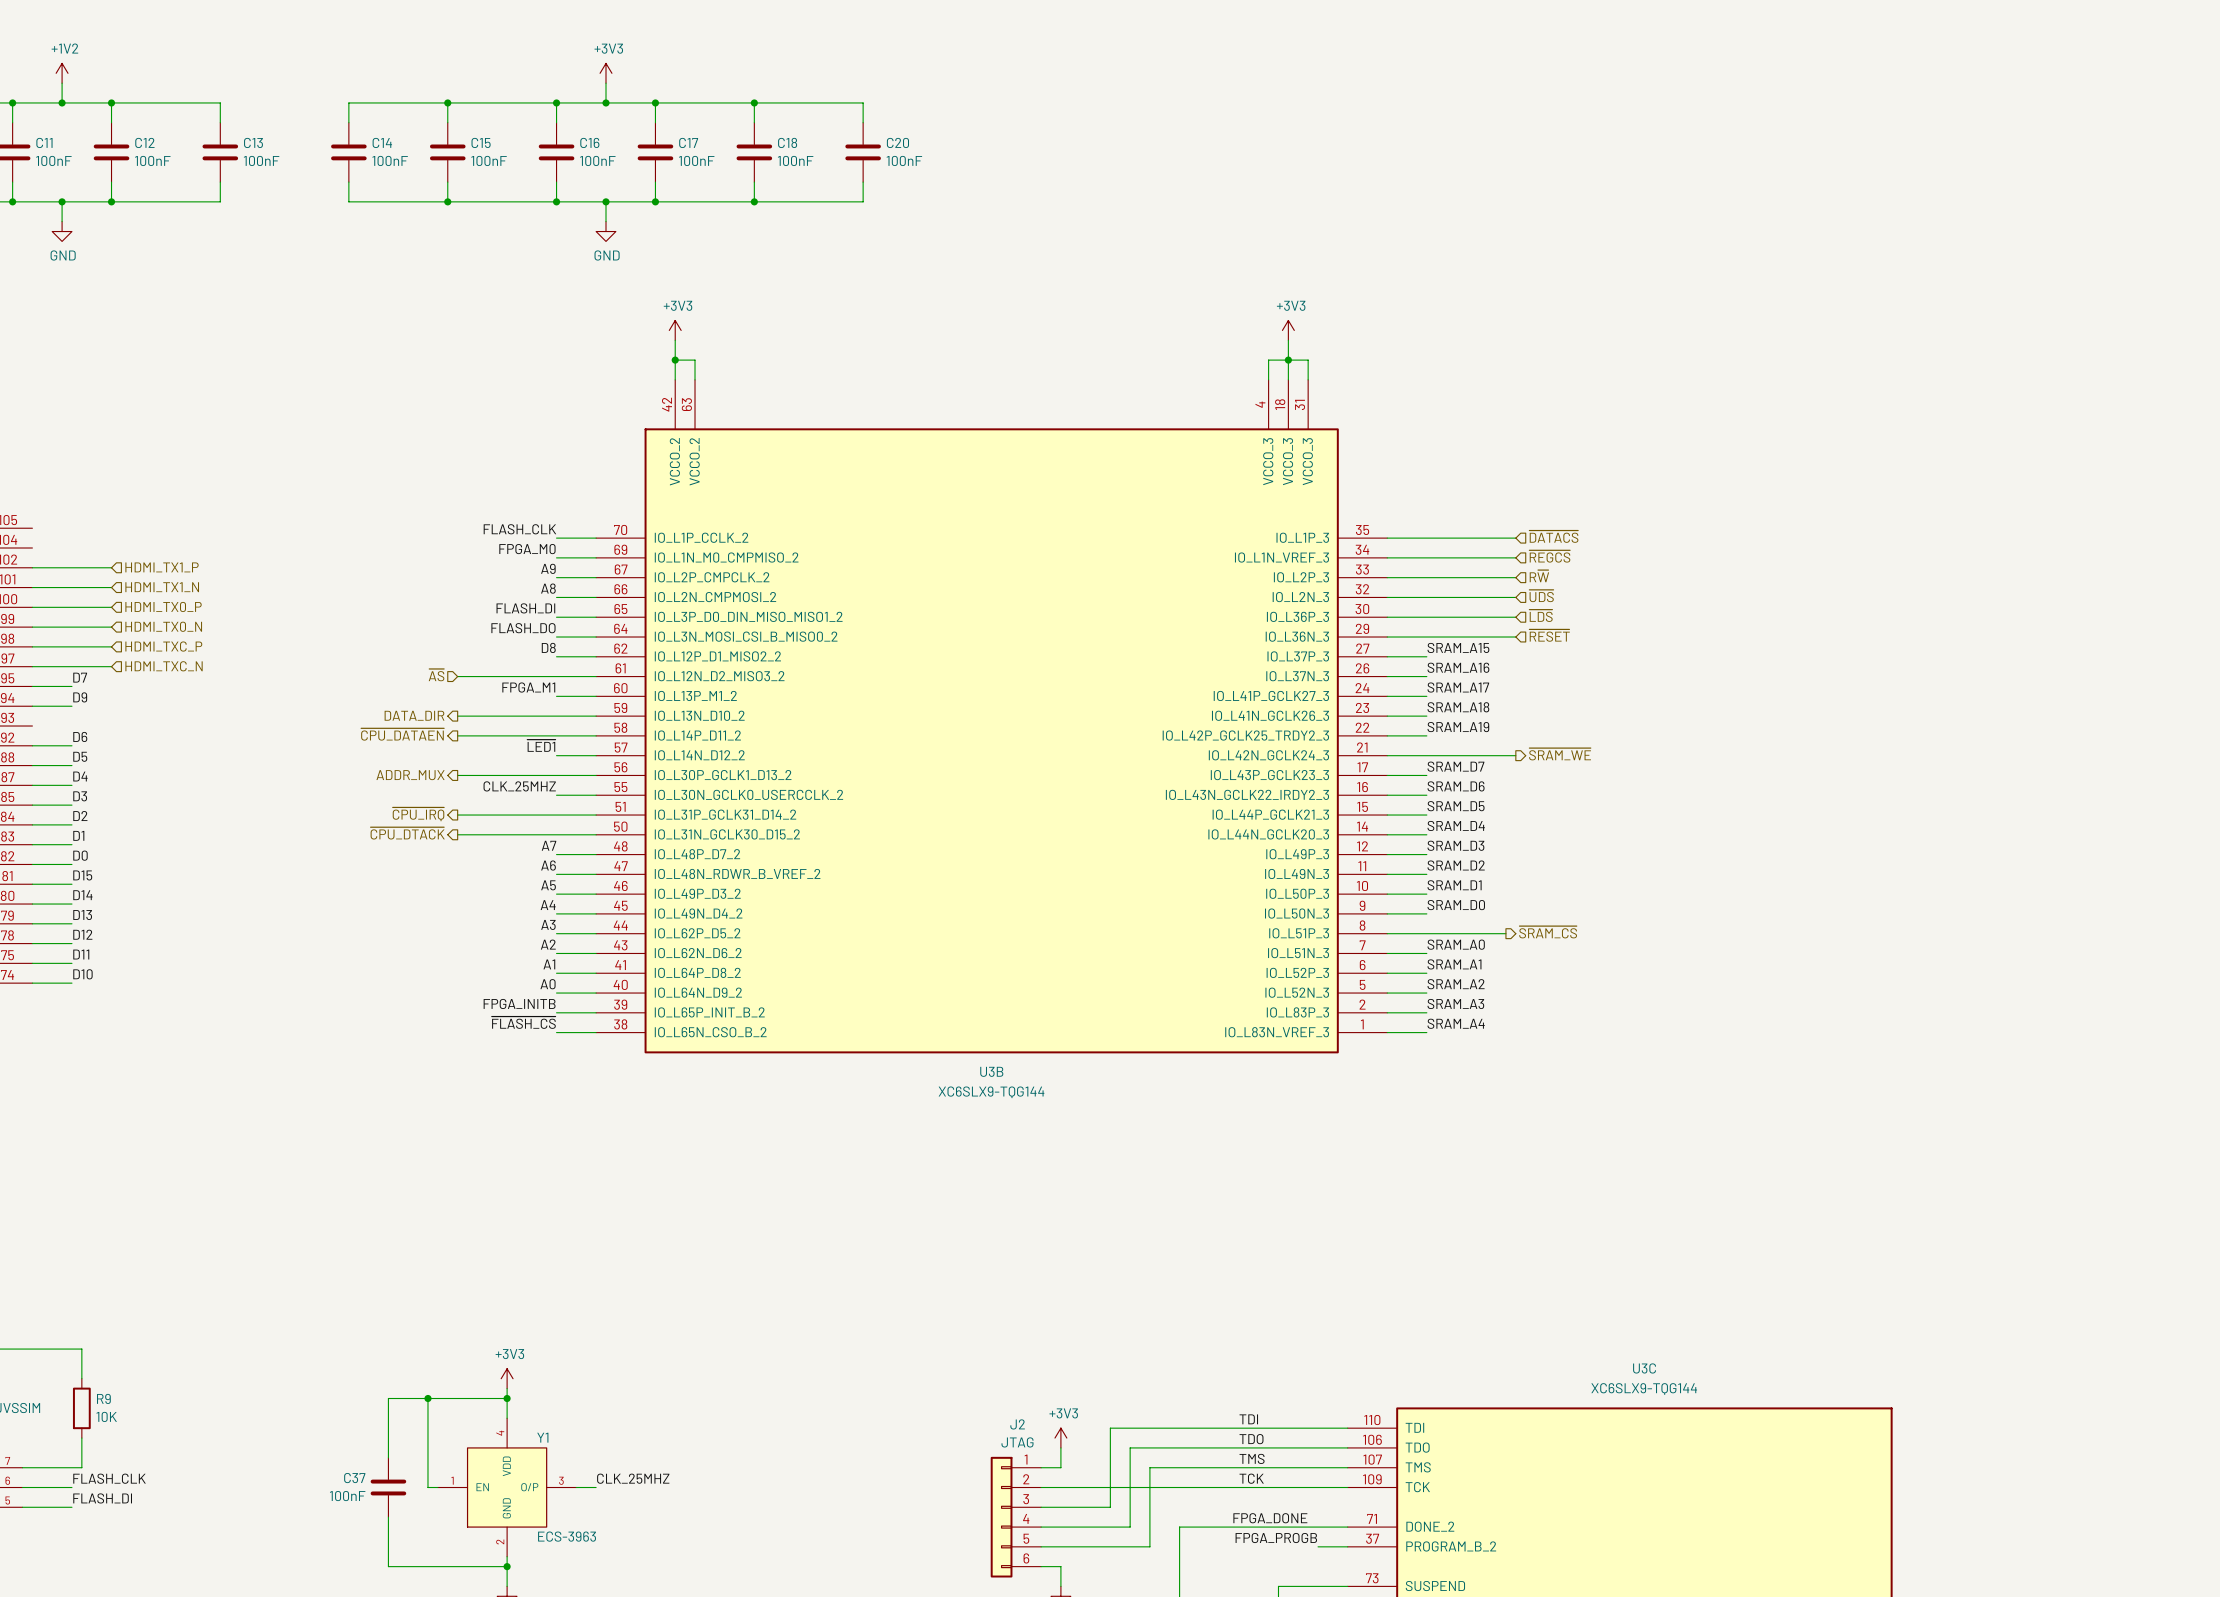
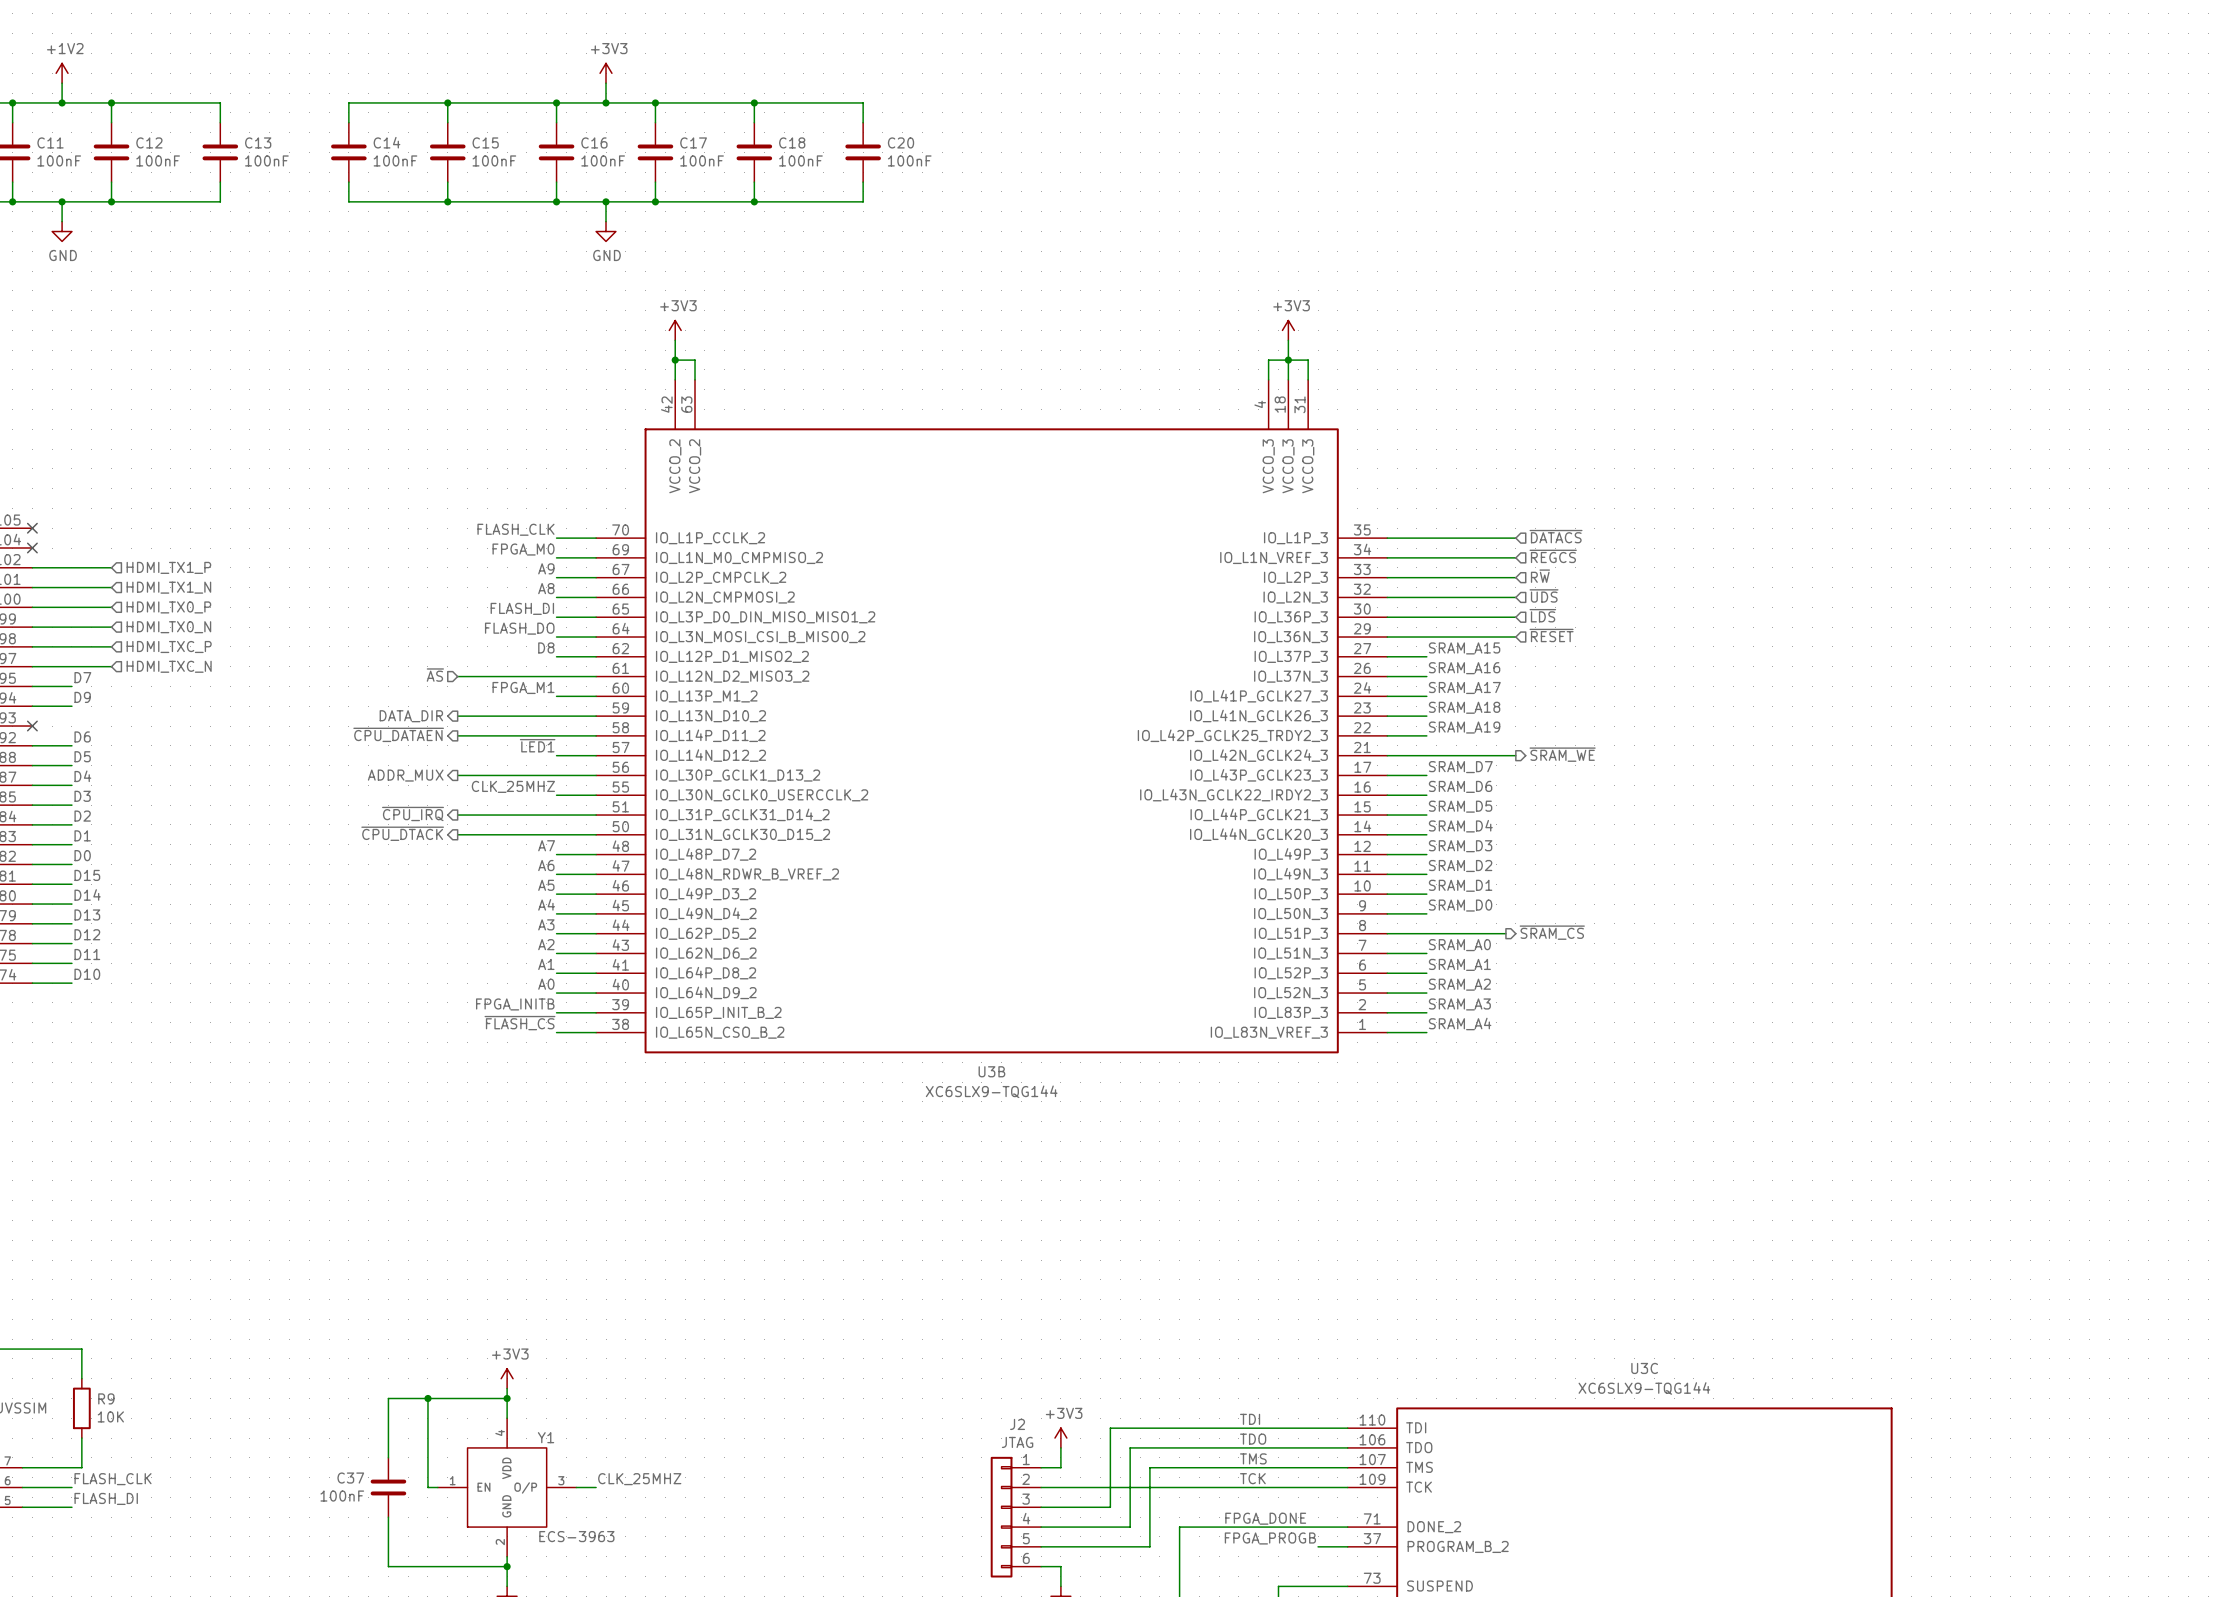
no-connect mark: none -> (32, 528)
no-connect mark: none -> (32, 548)
no-connect mark: none -> (32, 726)

